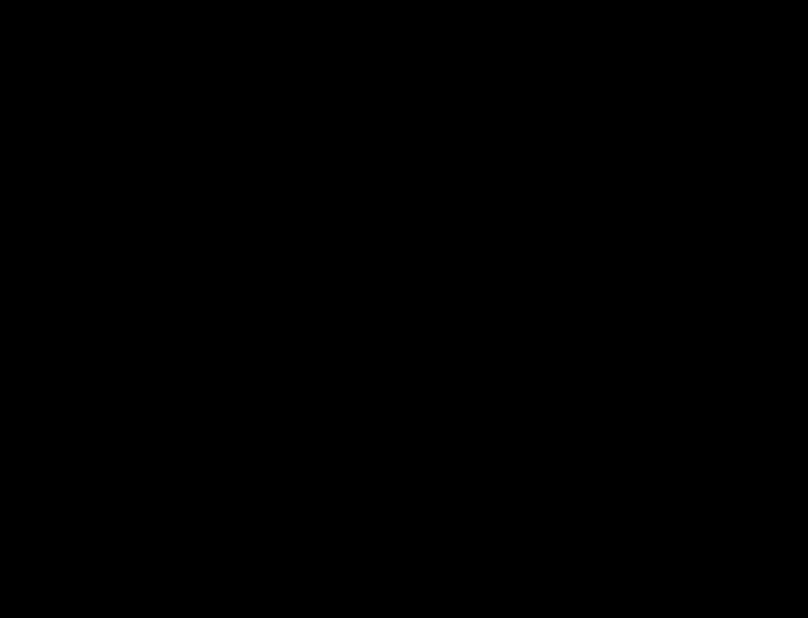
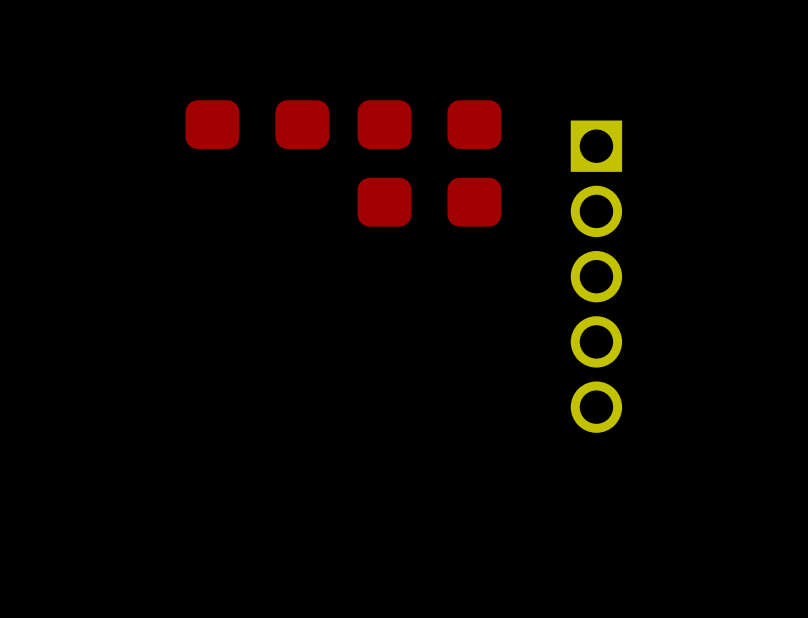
part: none -> (257, 124)
part: none -> (429, 124)
part: none -> (429, 202)
part: none -> (596, 276)

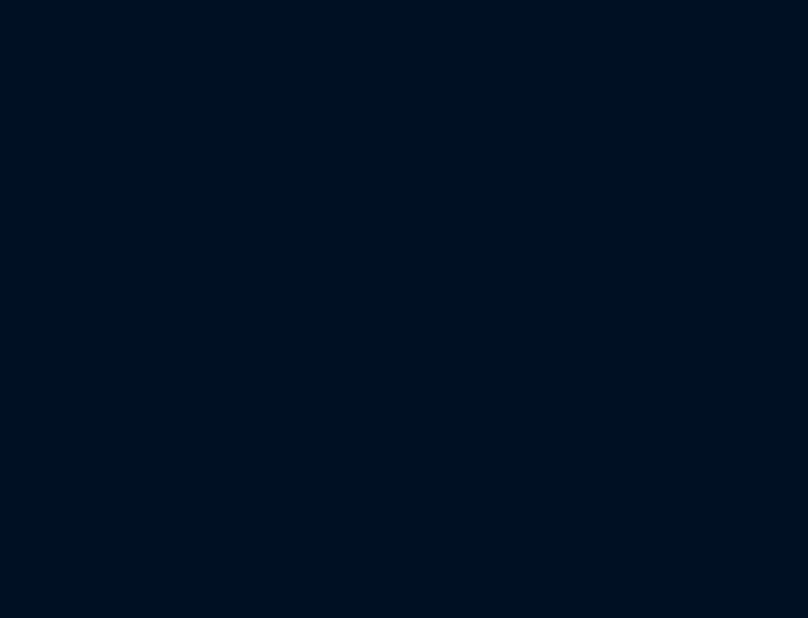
part: (257, 124) -> none
part: (429, 124) -> none
part: (429, 202) -> none
part: (596, 276) -> none

